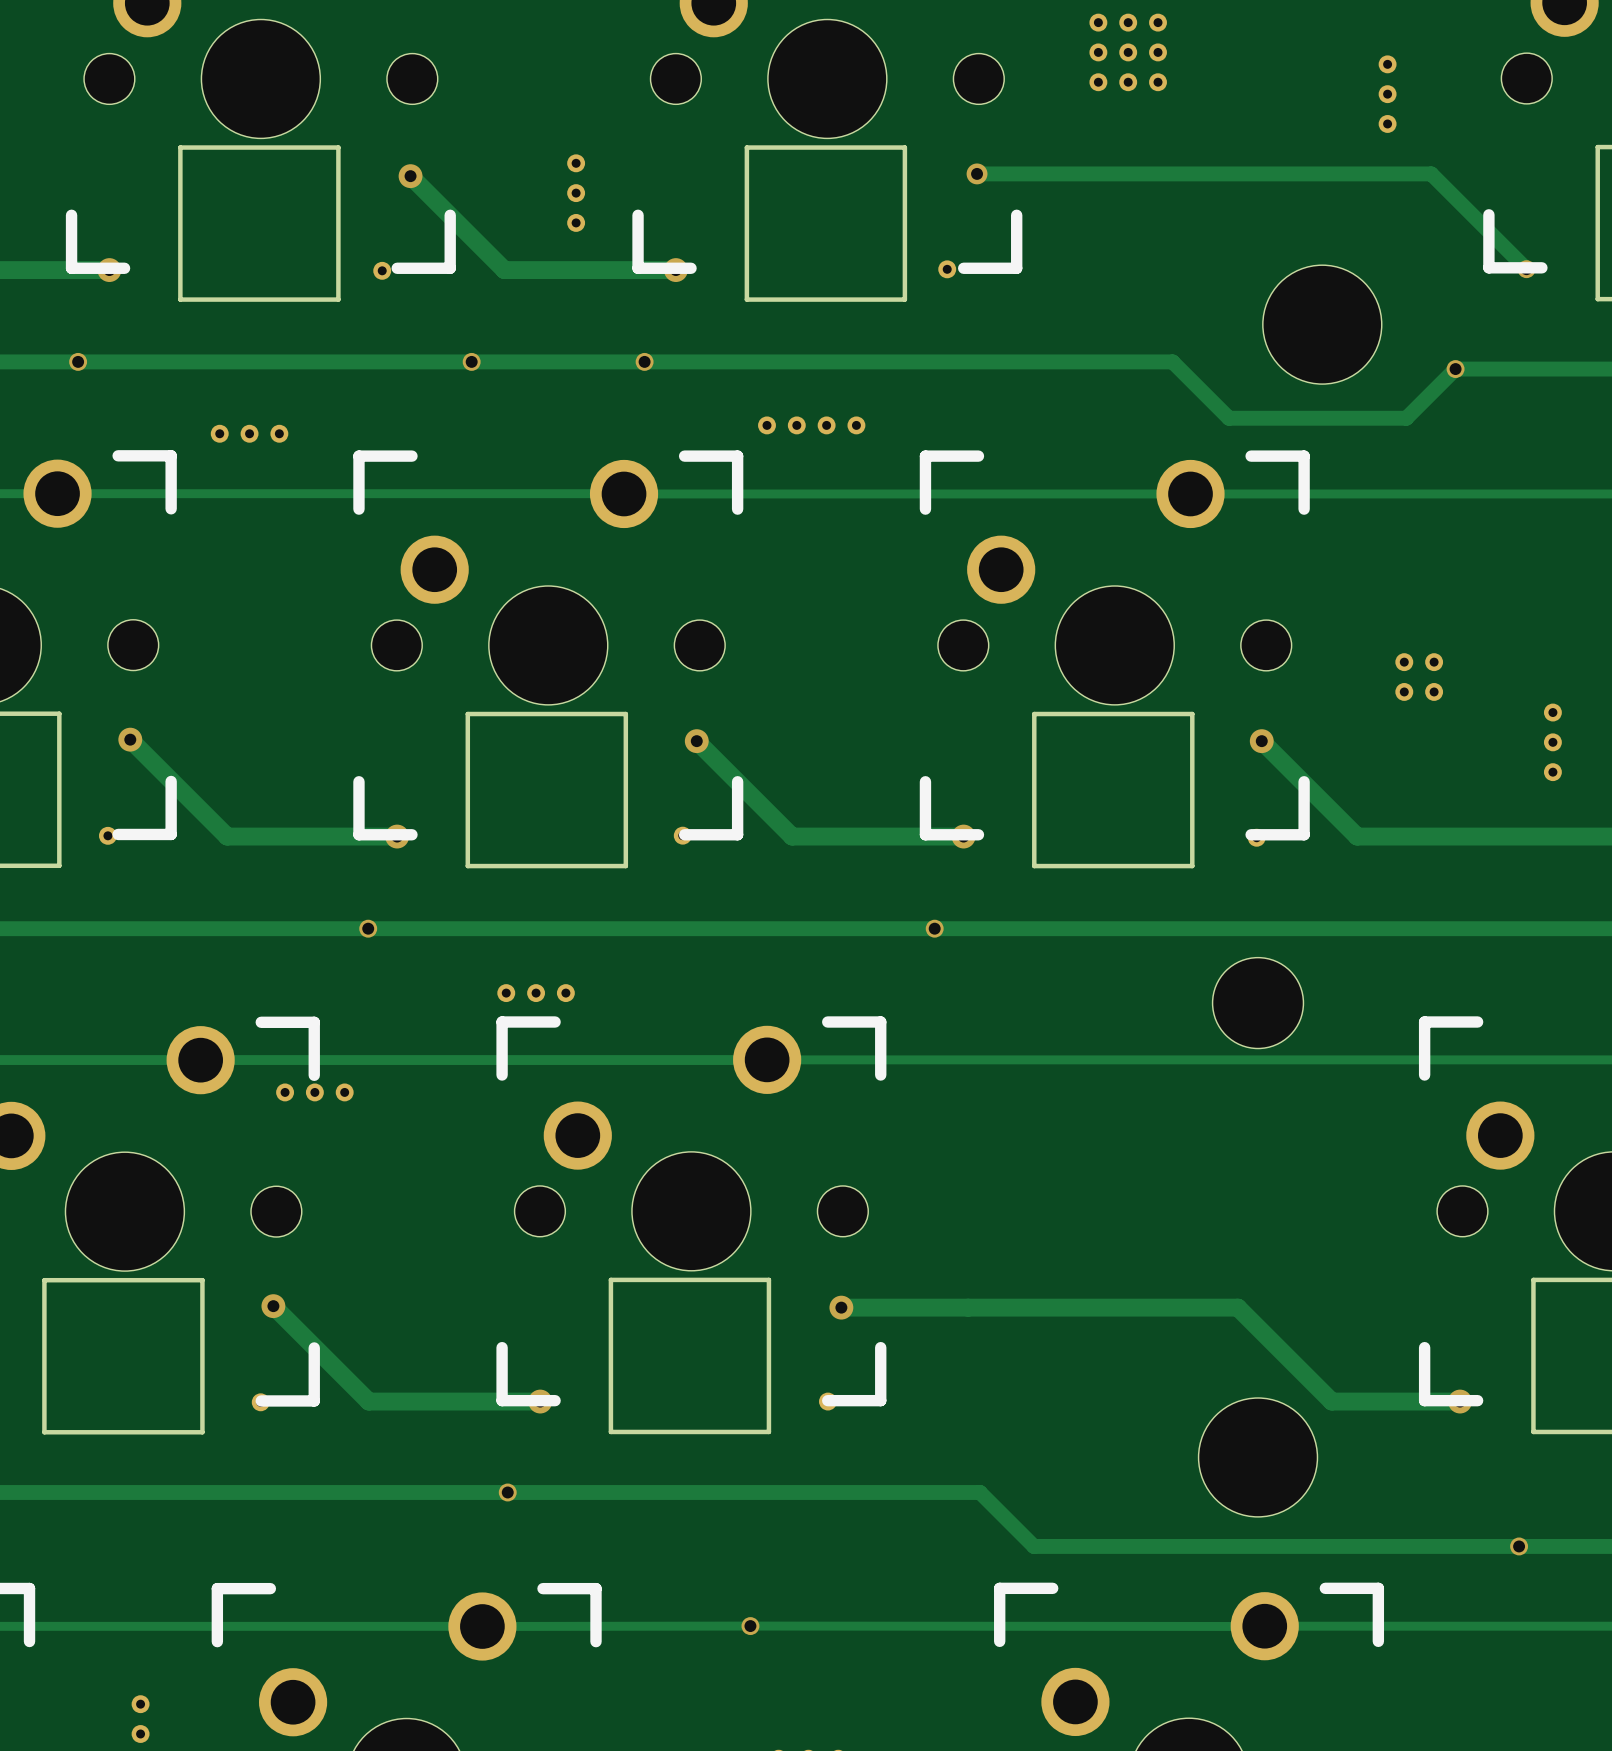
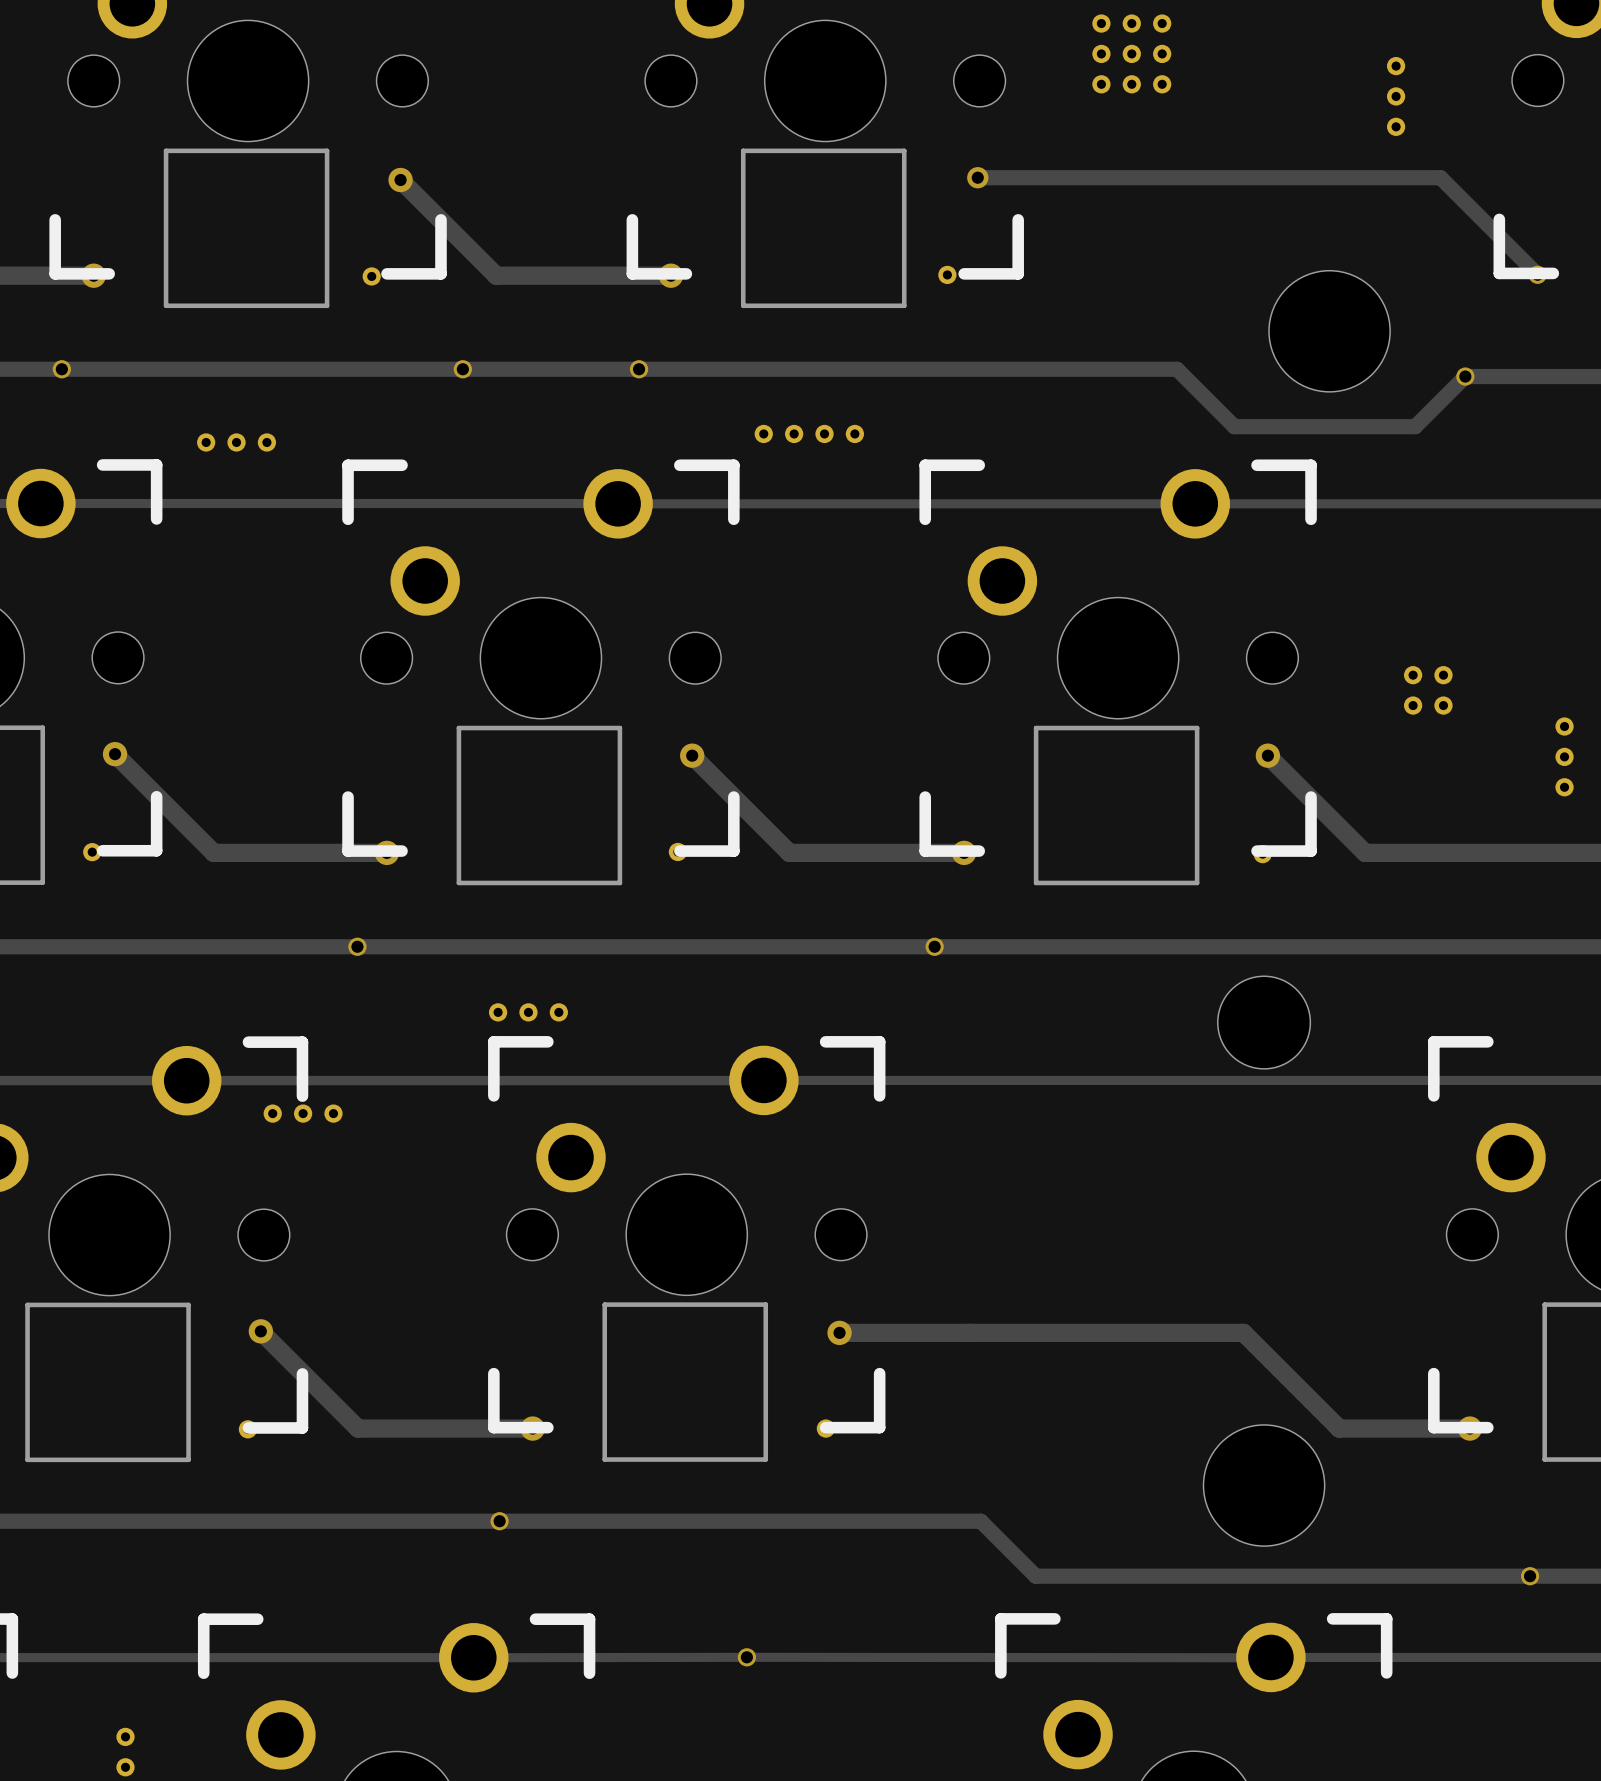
part: (576, 163) -> none
part: (576, 193) -> none
part: (576, 222) -> none

